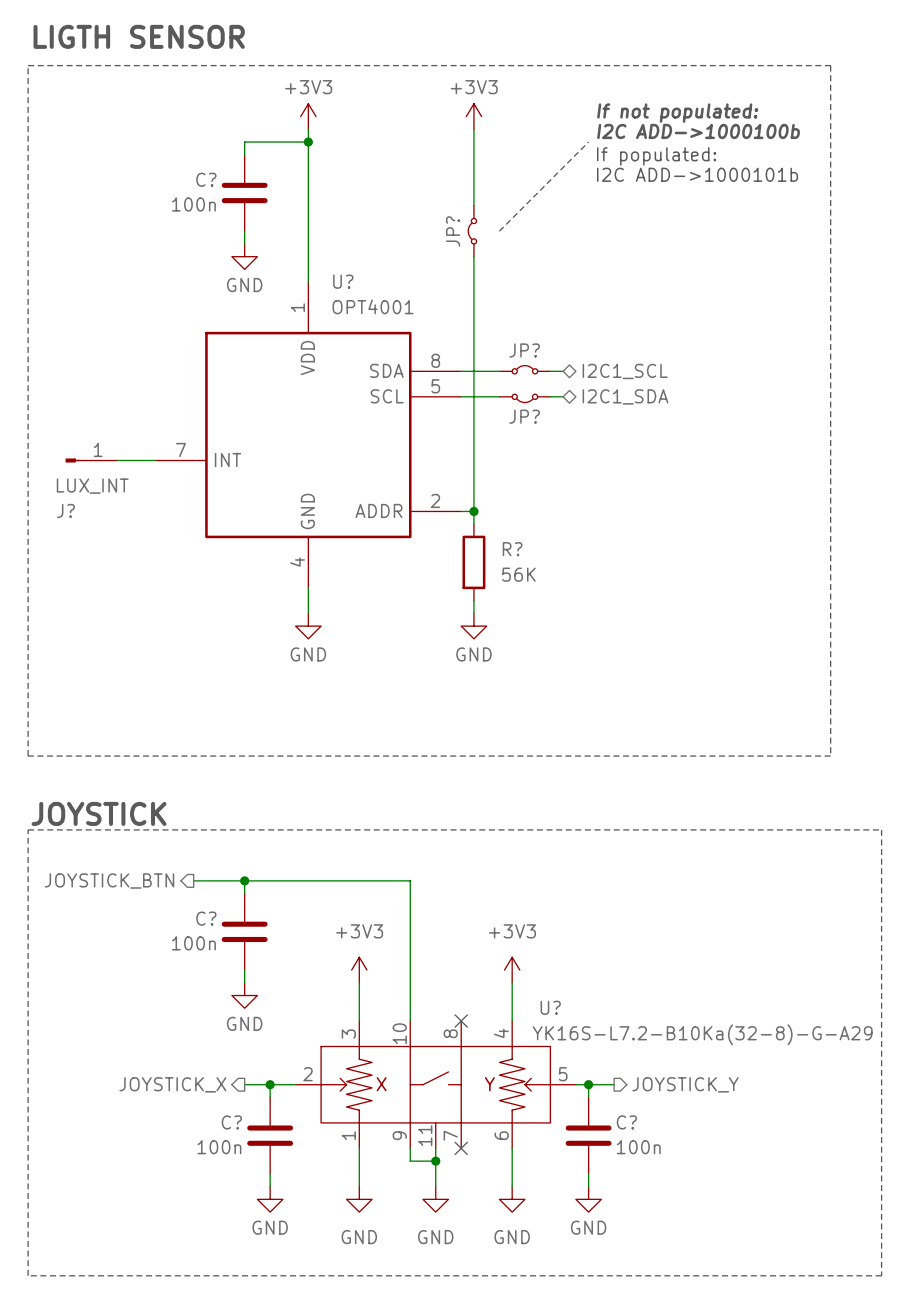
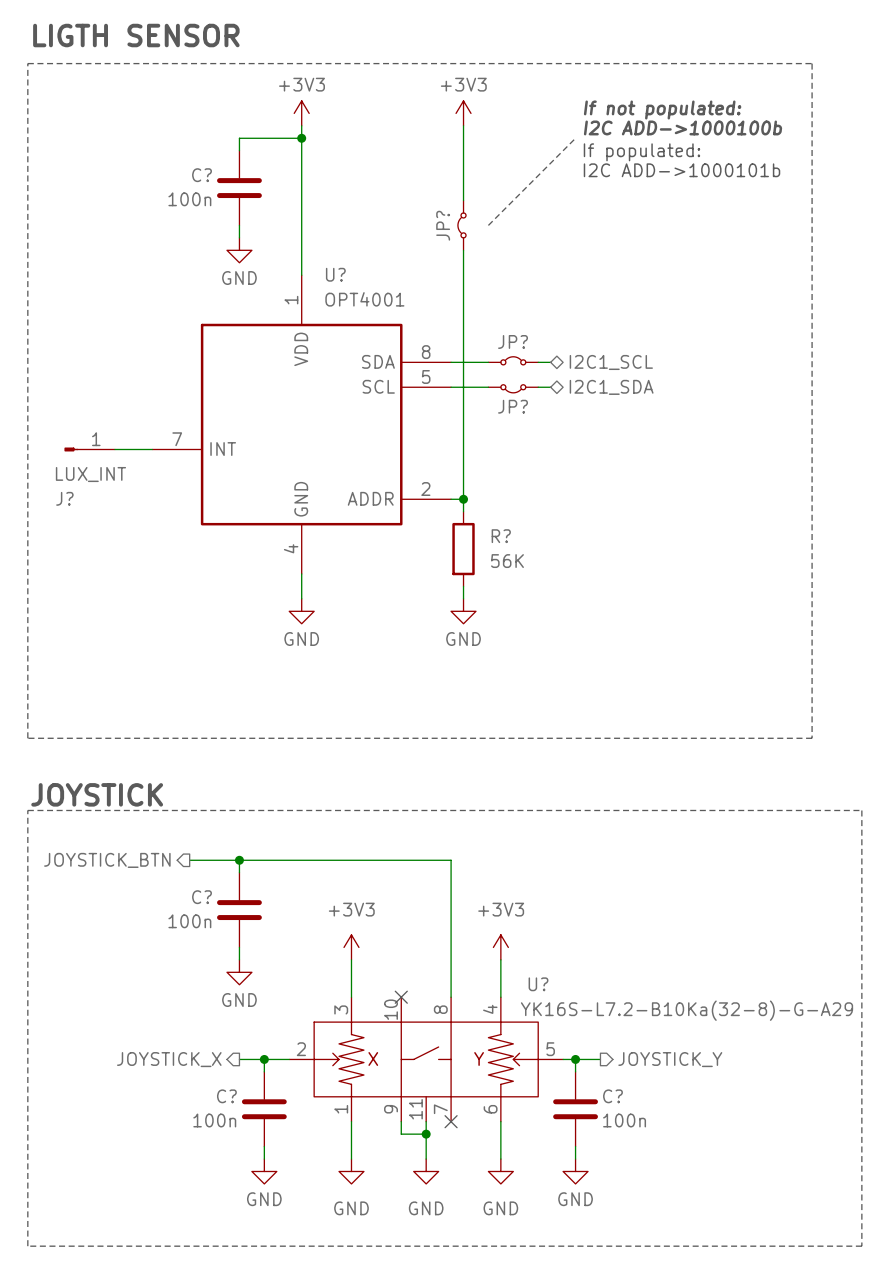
wire: (410, 880) (410, 1021) -> (401, 860) (451, 860) (451, 997)
no-connect mark position: (461, 1021) -> (401, 997)

